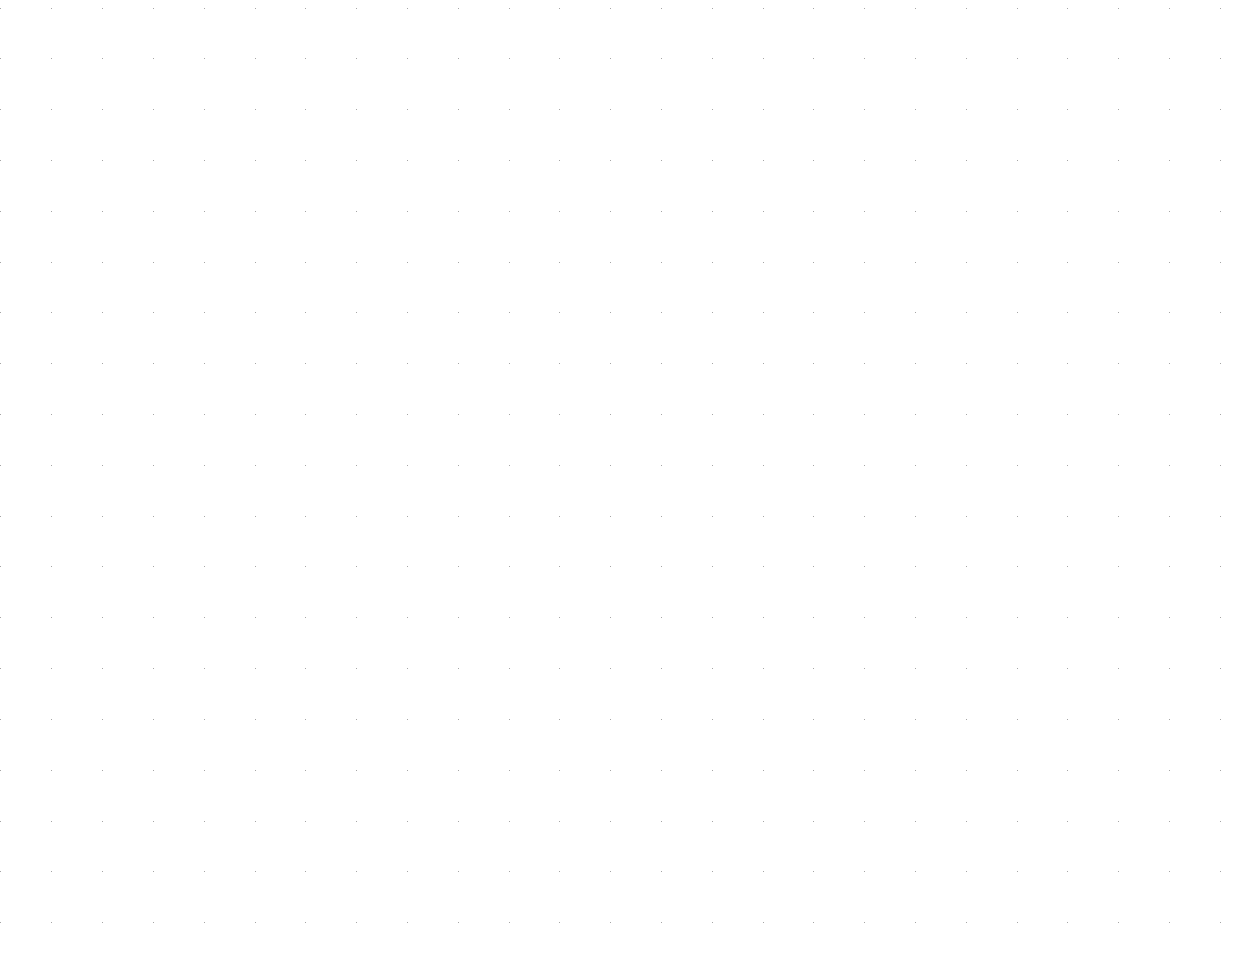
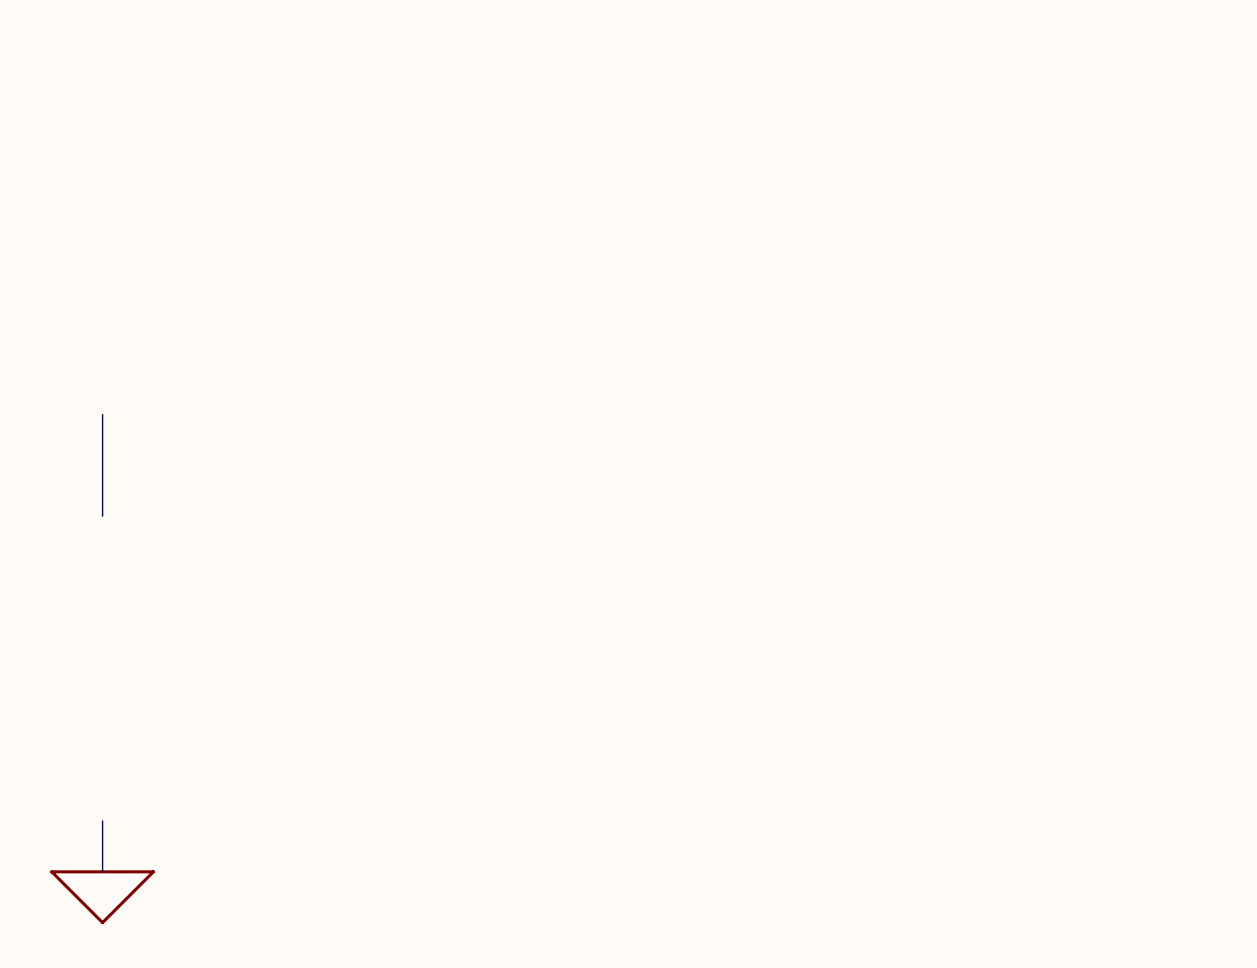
wire: none -> (102, 414) (102, 516)
wire: none -> (102, 821) (102, 871)
power symbol: none -> (102, 897)

